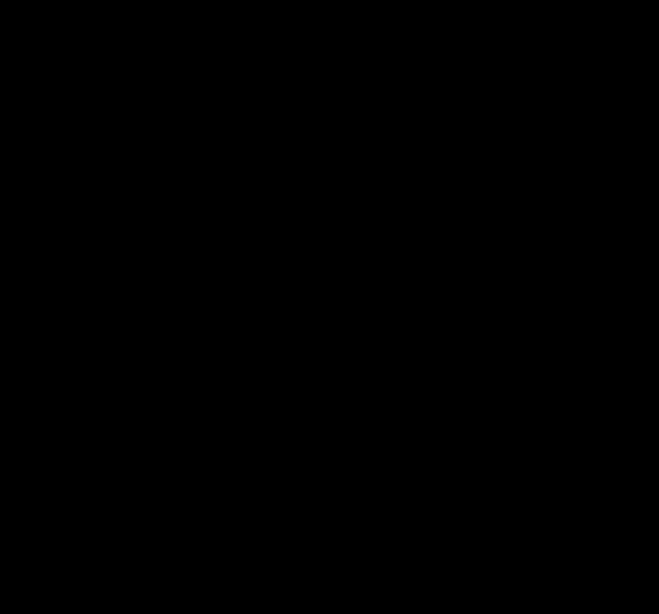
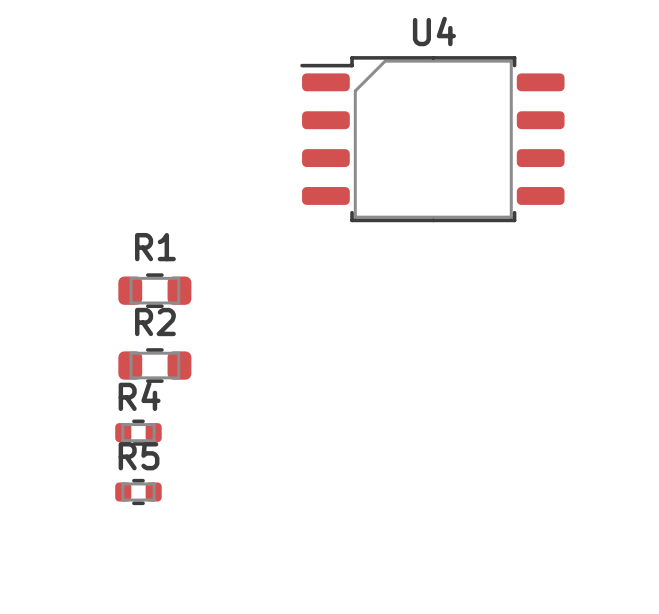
U4: none -> (432, 139)
R1: none -> (154, 290)
R2: none -> (154, 365)
R4: none -> (138, 432)
R5: none -> (138, 491)

